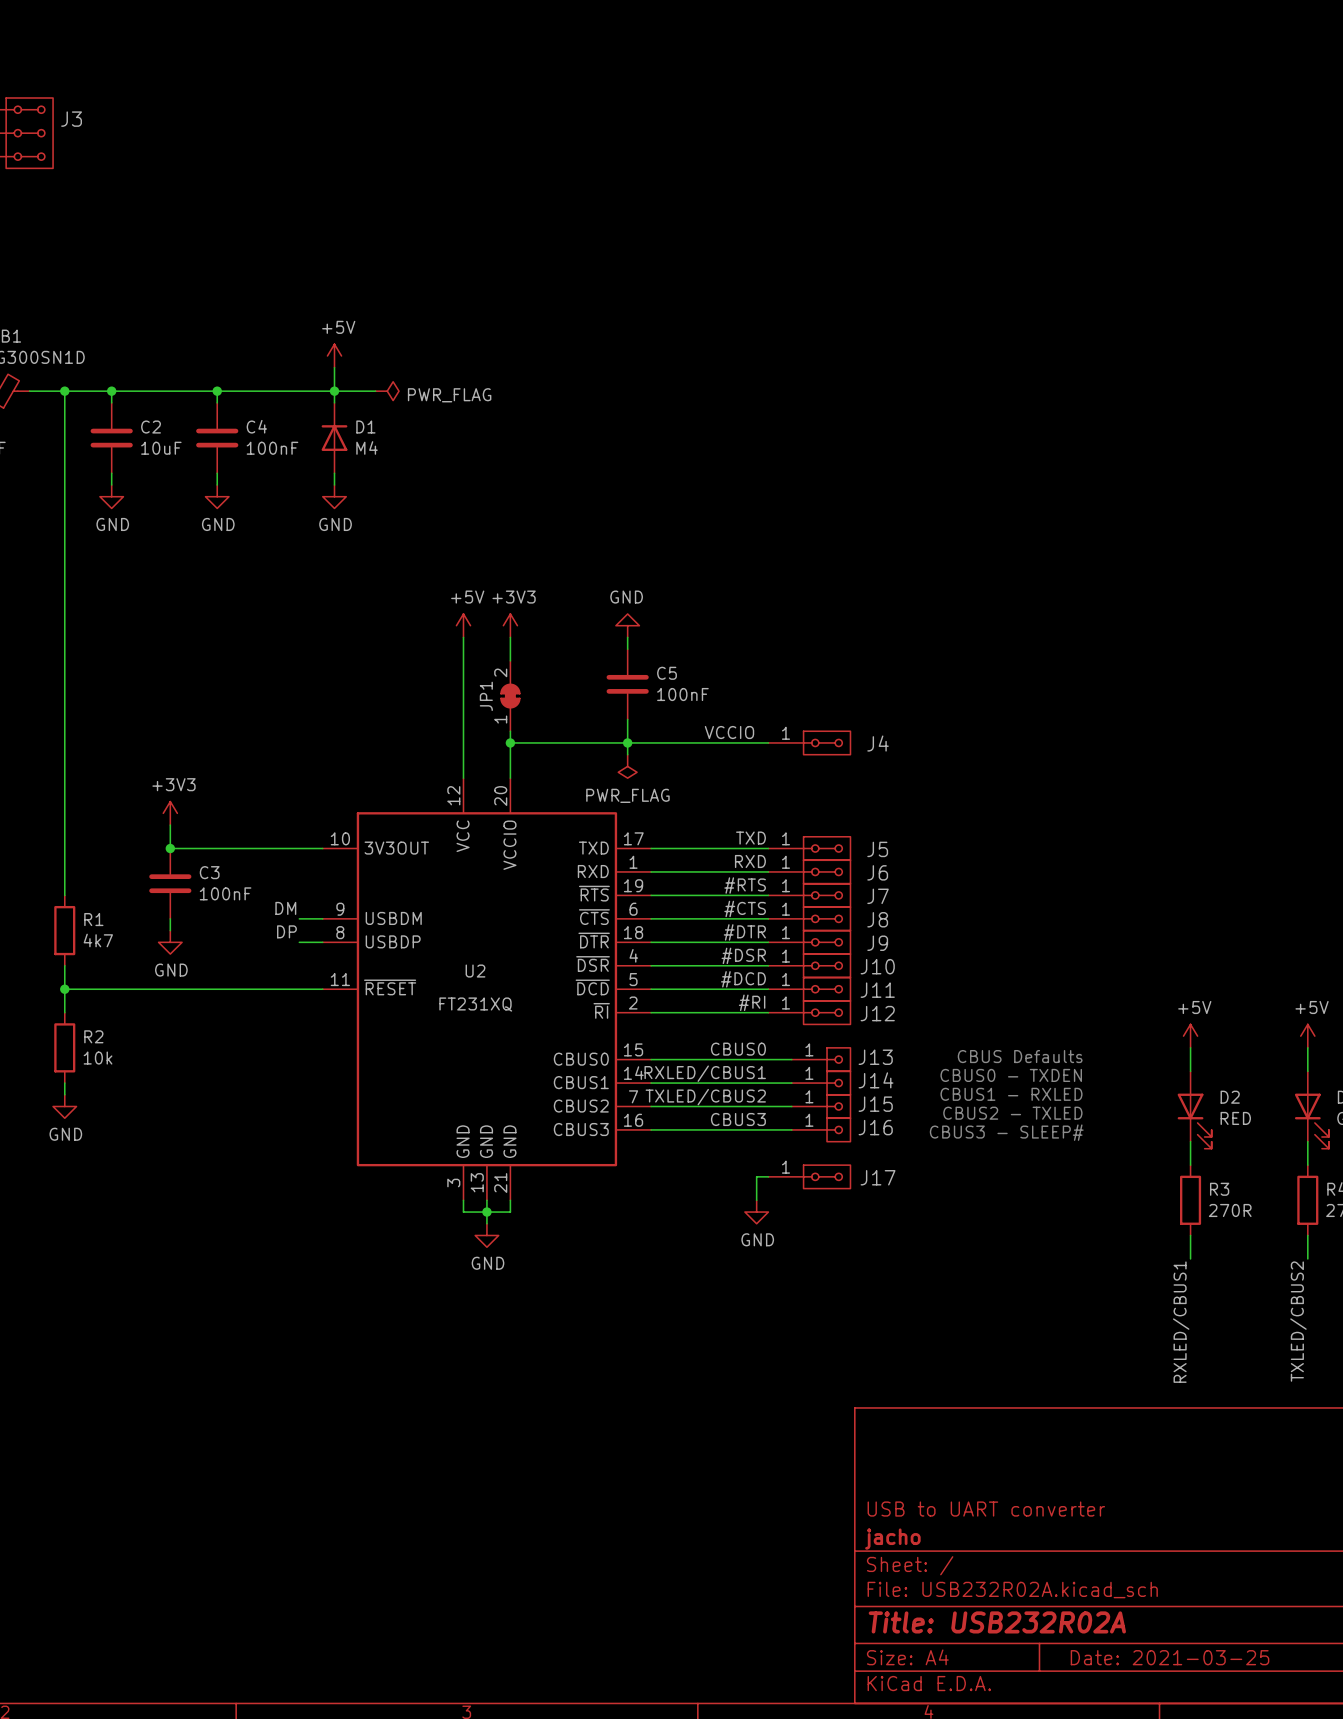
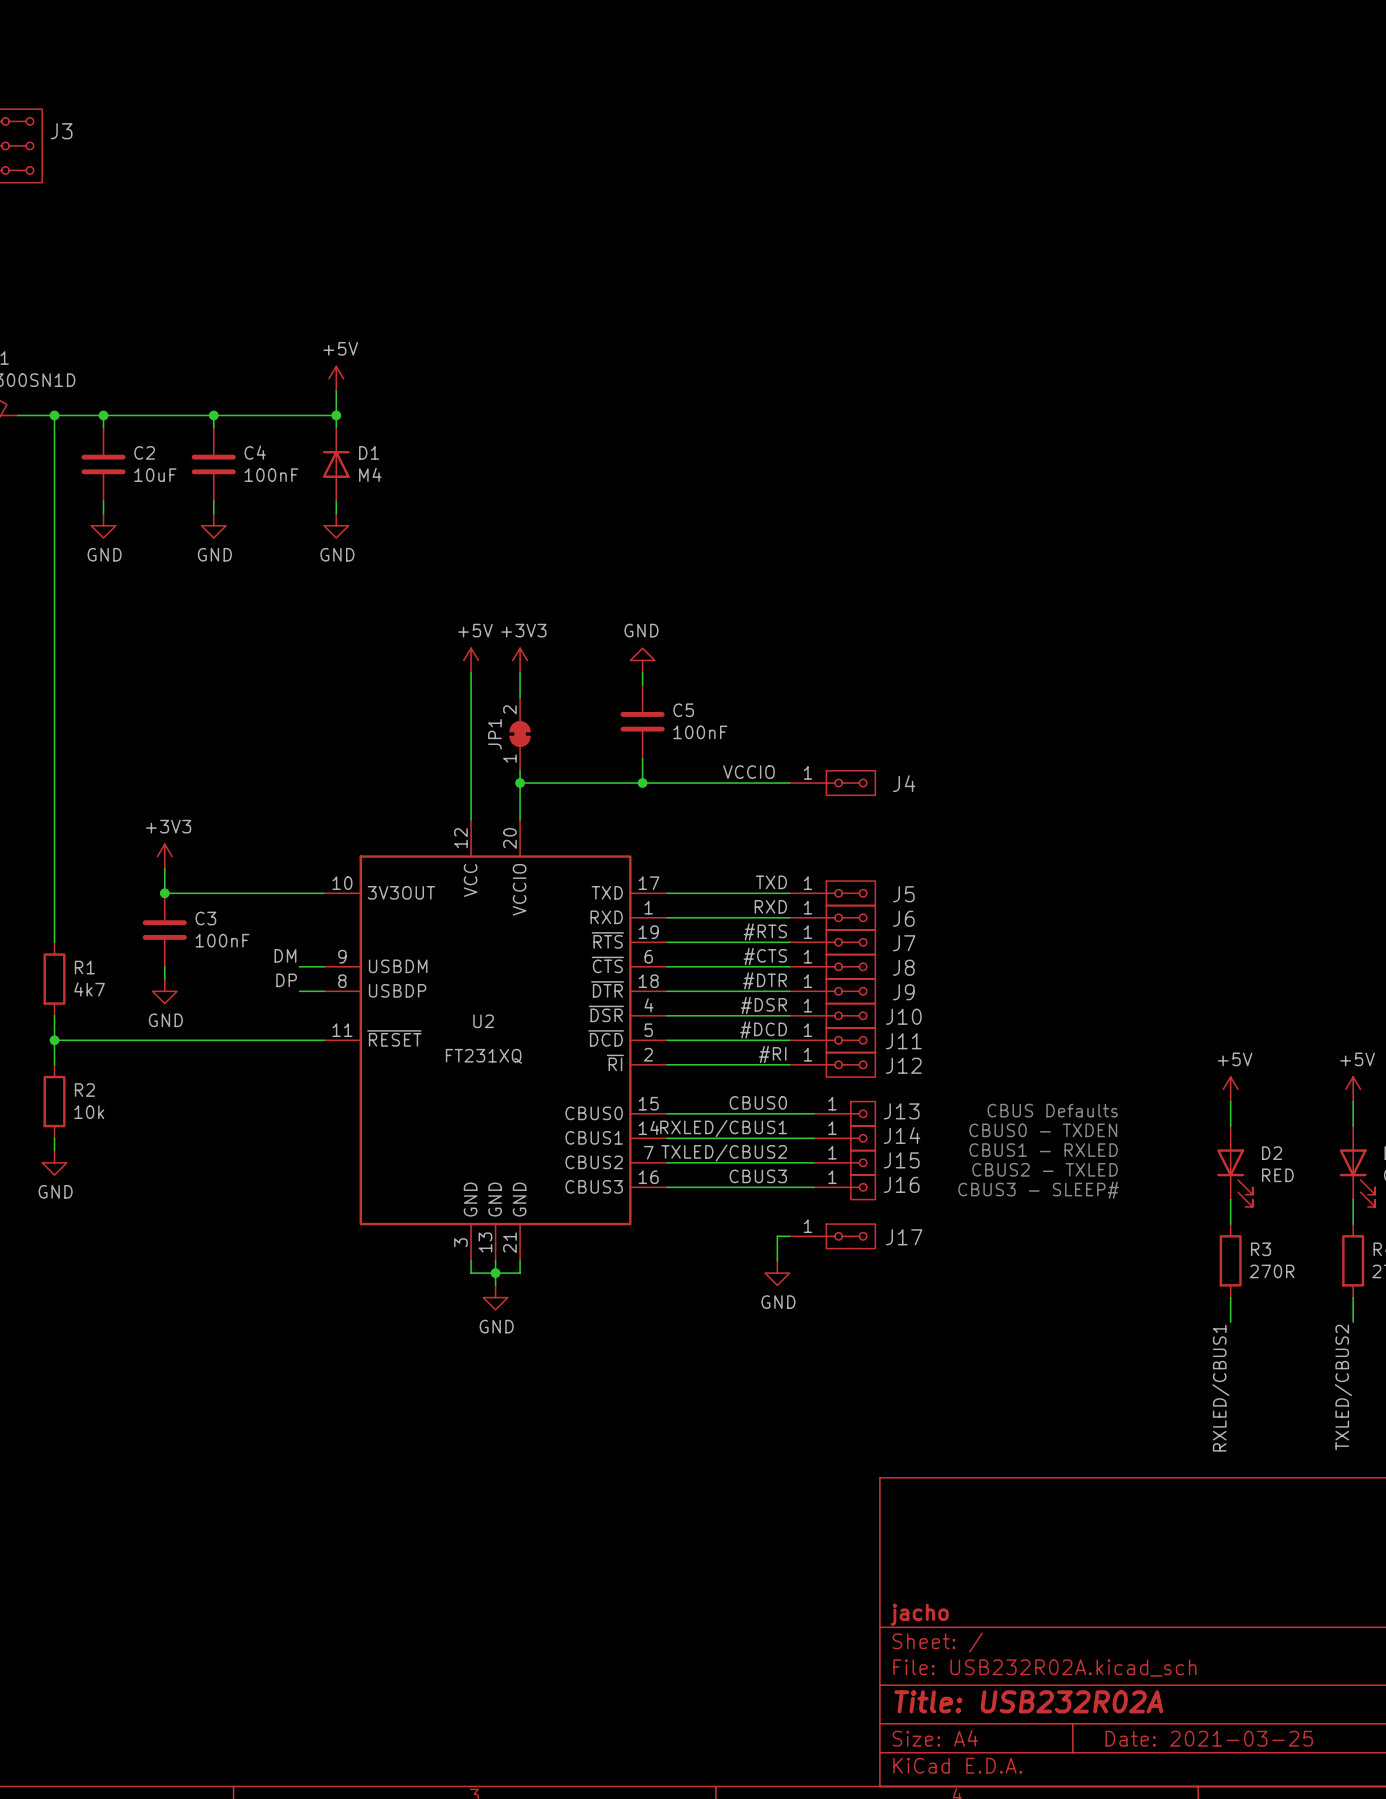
wire: (334, 391) (375, 391) -> none
power symbol: PWR_FLAG (387, 391) -> none
wire: (627, 742) (627, 754) -> none
power symbol: PWR_FLAG (627, 766) -> none
title block: USB to UART converter (986, 1509) -> none

